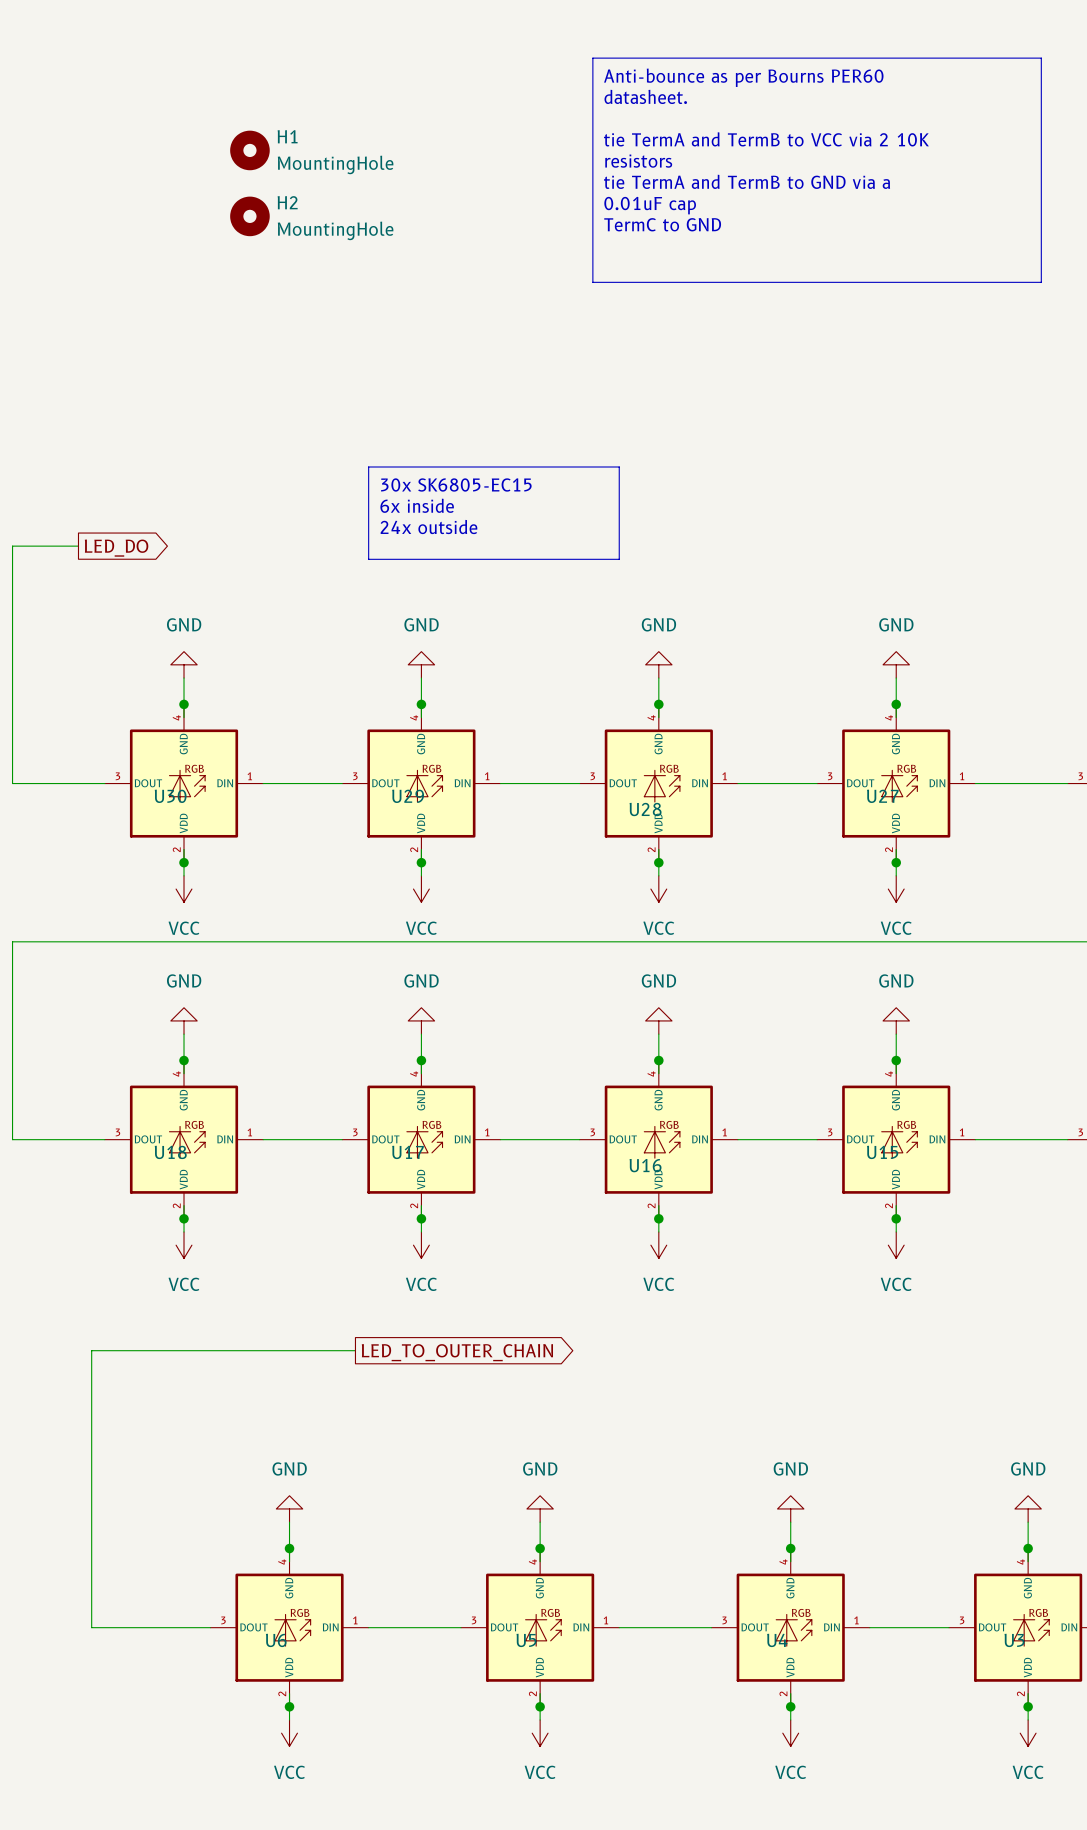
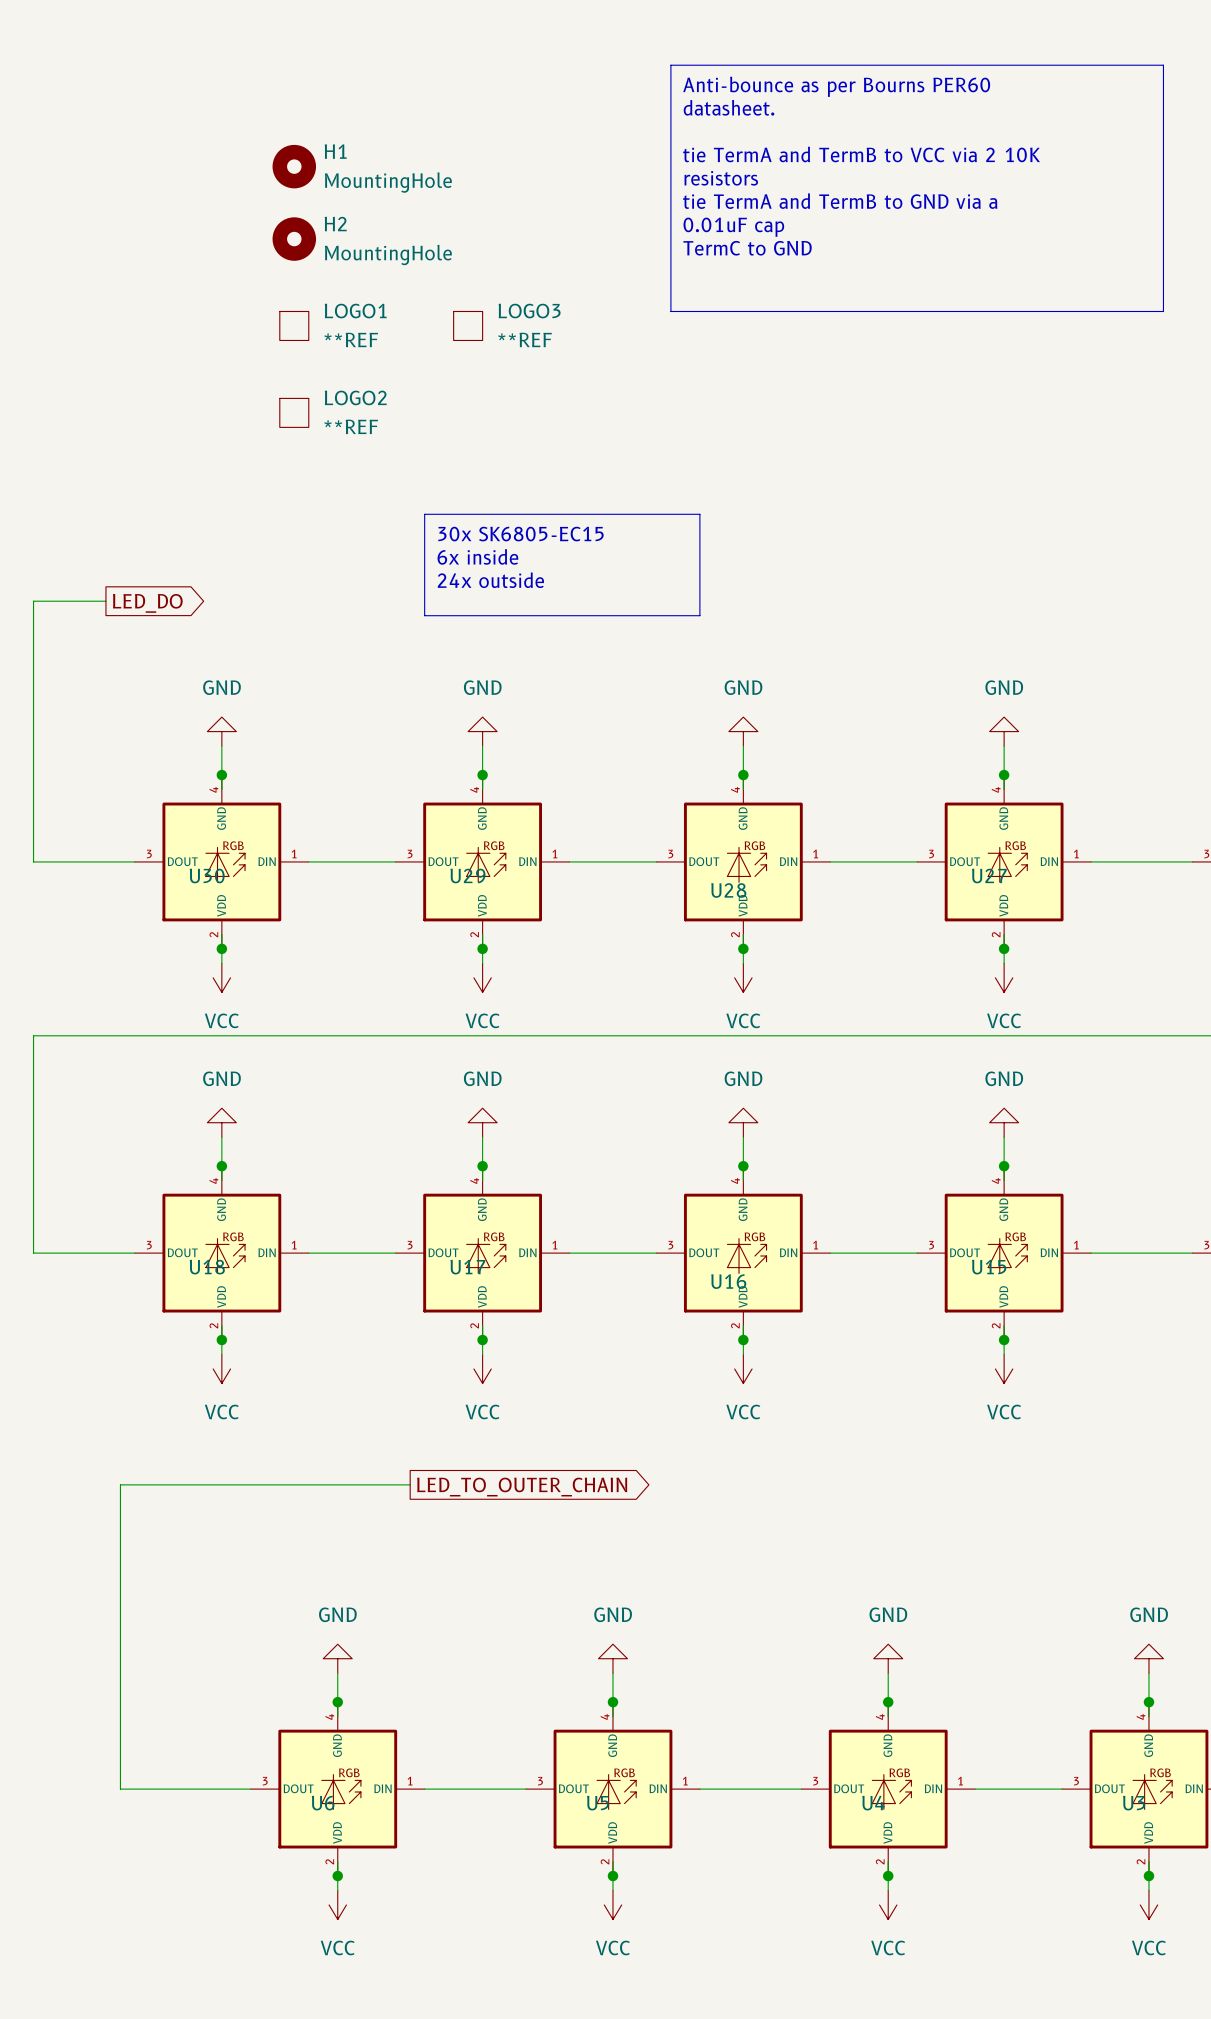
LOGO1: none -> **REF (294, 325)
LOGO3: none -> **REF (468, 325)
LOGO2: none -> **REF (294, 412)

